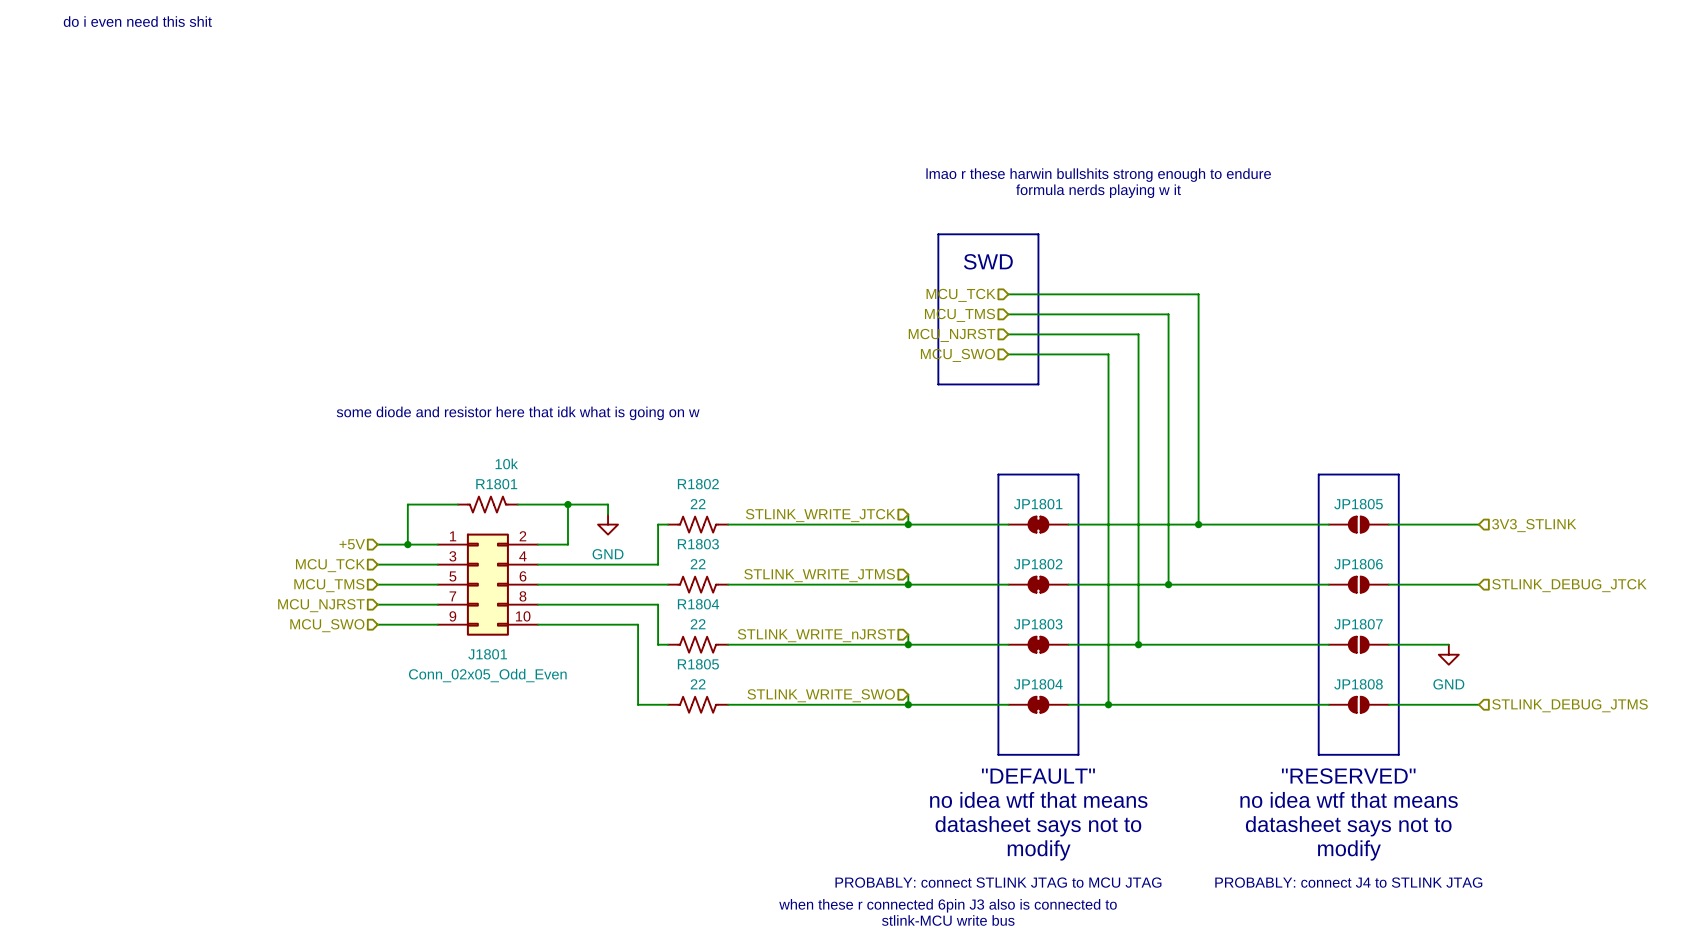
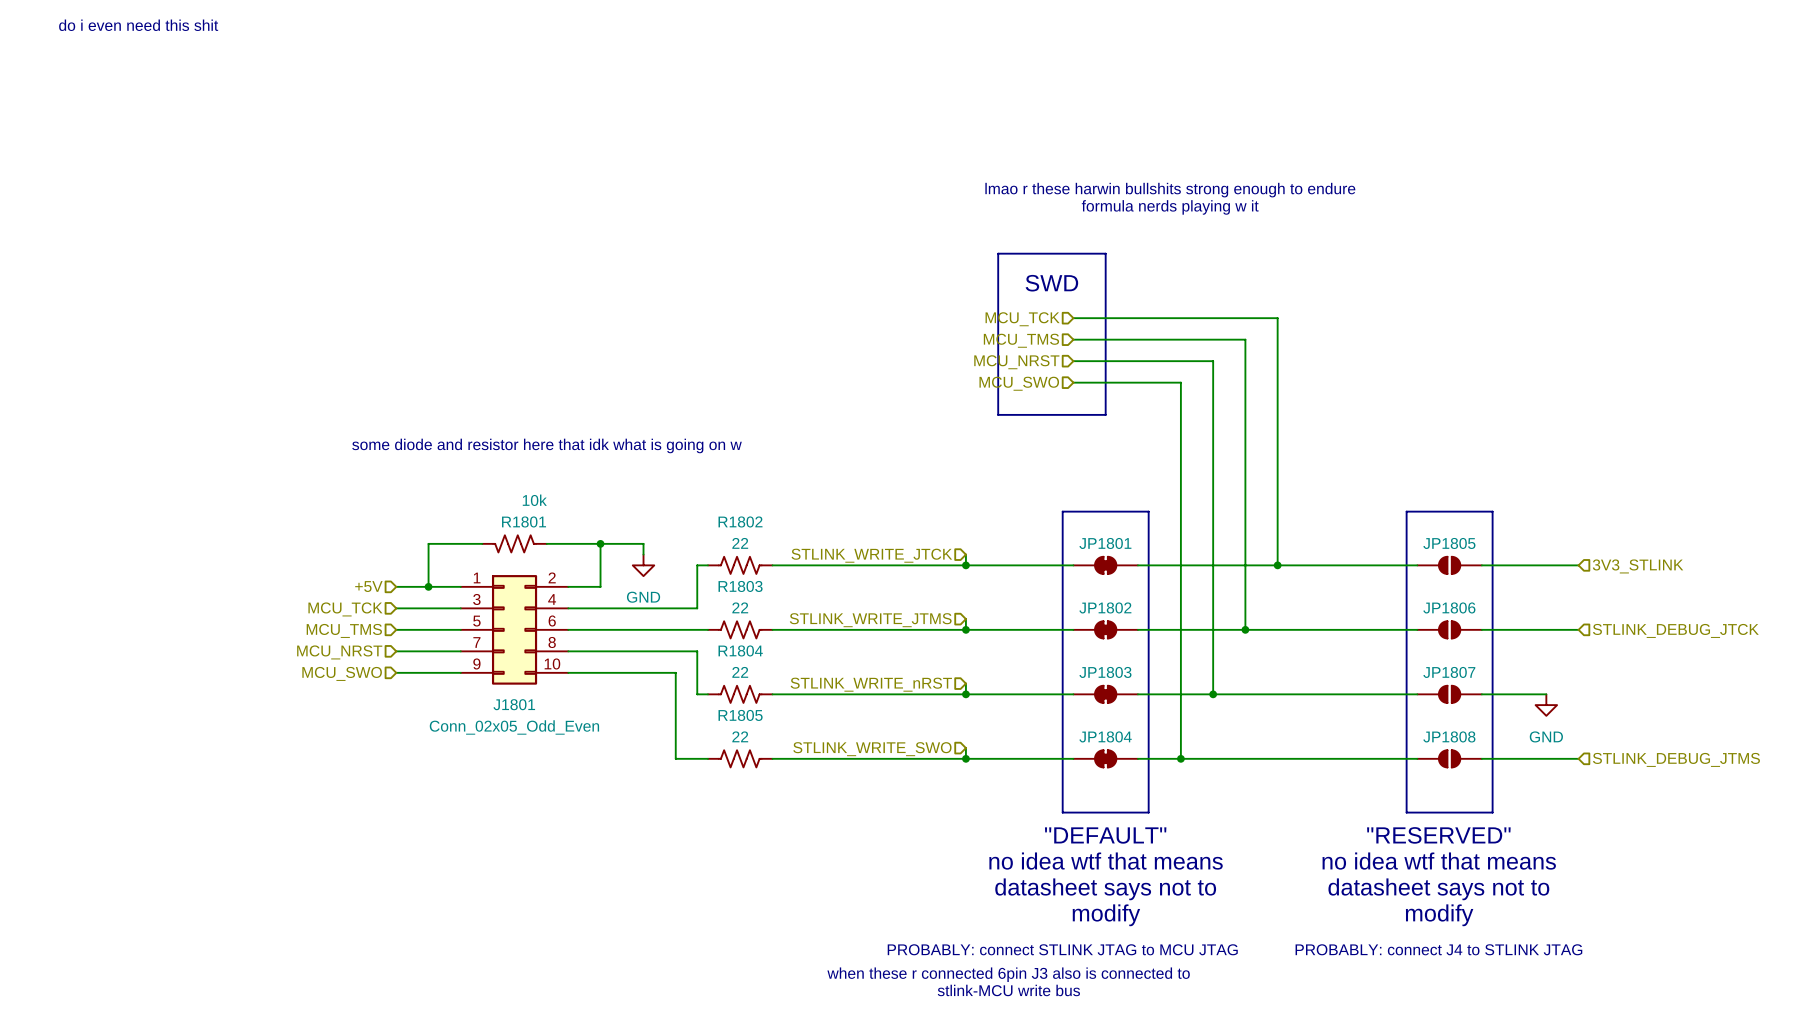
hierarchical label: MCU_NJRST (952, 335) -> MCU_NRST (1016, 362)
hierarchical label: MCU_NJRST (321, 605) -> MCU_NRST (339, 652)
hierarchical label: STLINK_WRITE_nJRST (816, 635) -> STLINK_WRITE_nRST (871, 684)

